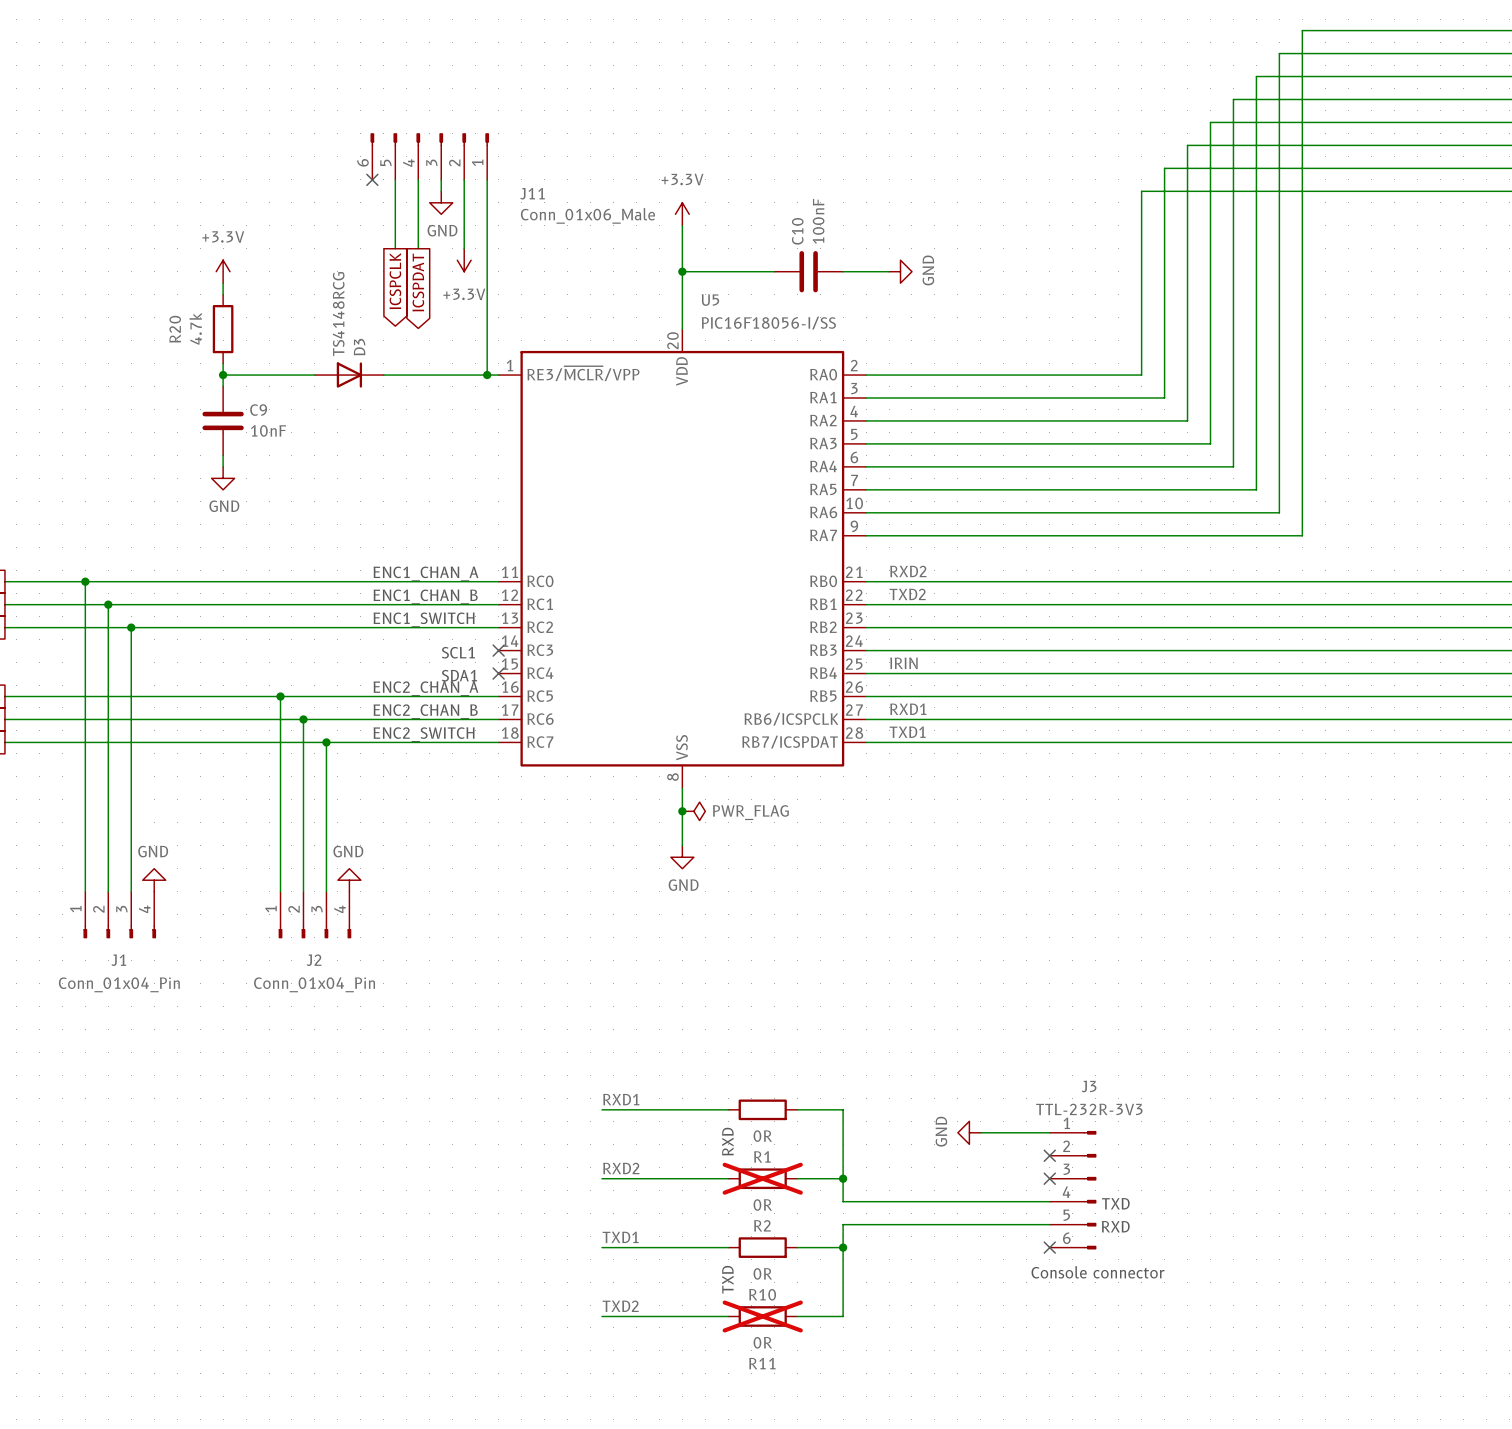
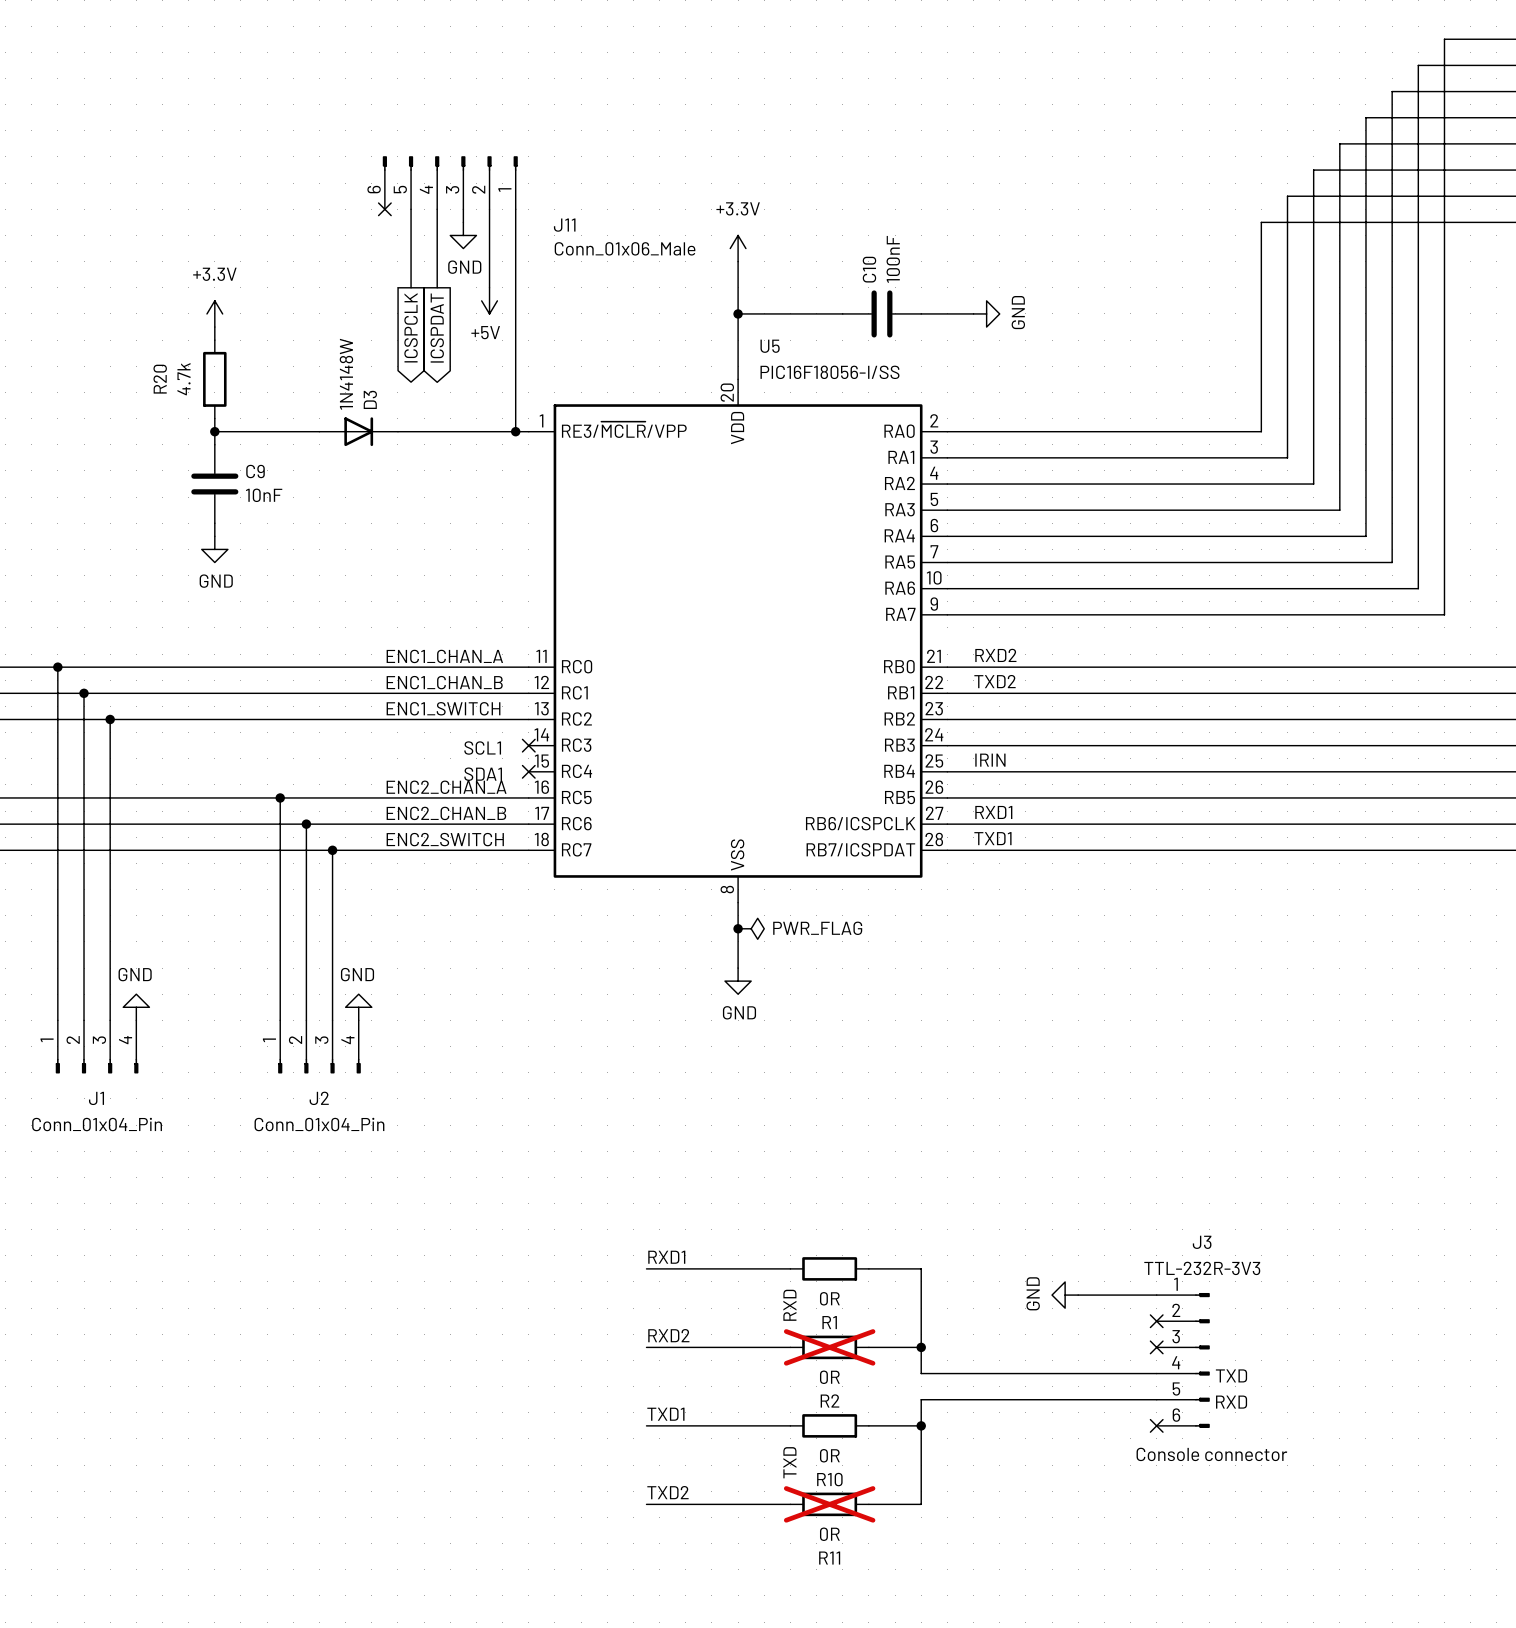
power symbol: +3.3V (464, 260) -> +5V (489, 300)
D3 value: TS4148RCG (338, 314) -> 1N4148W (346, 374)

